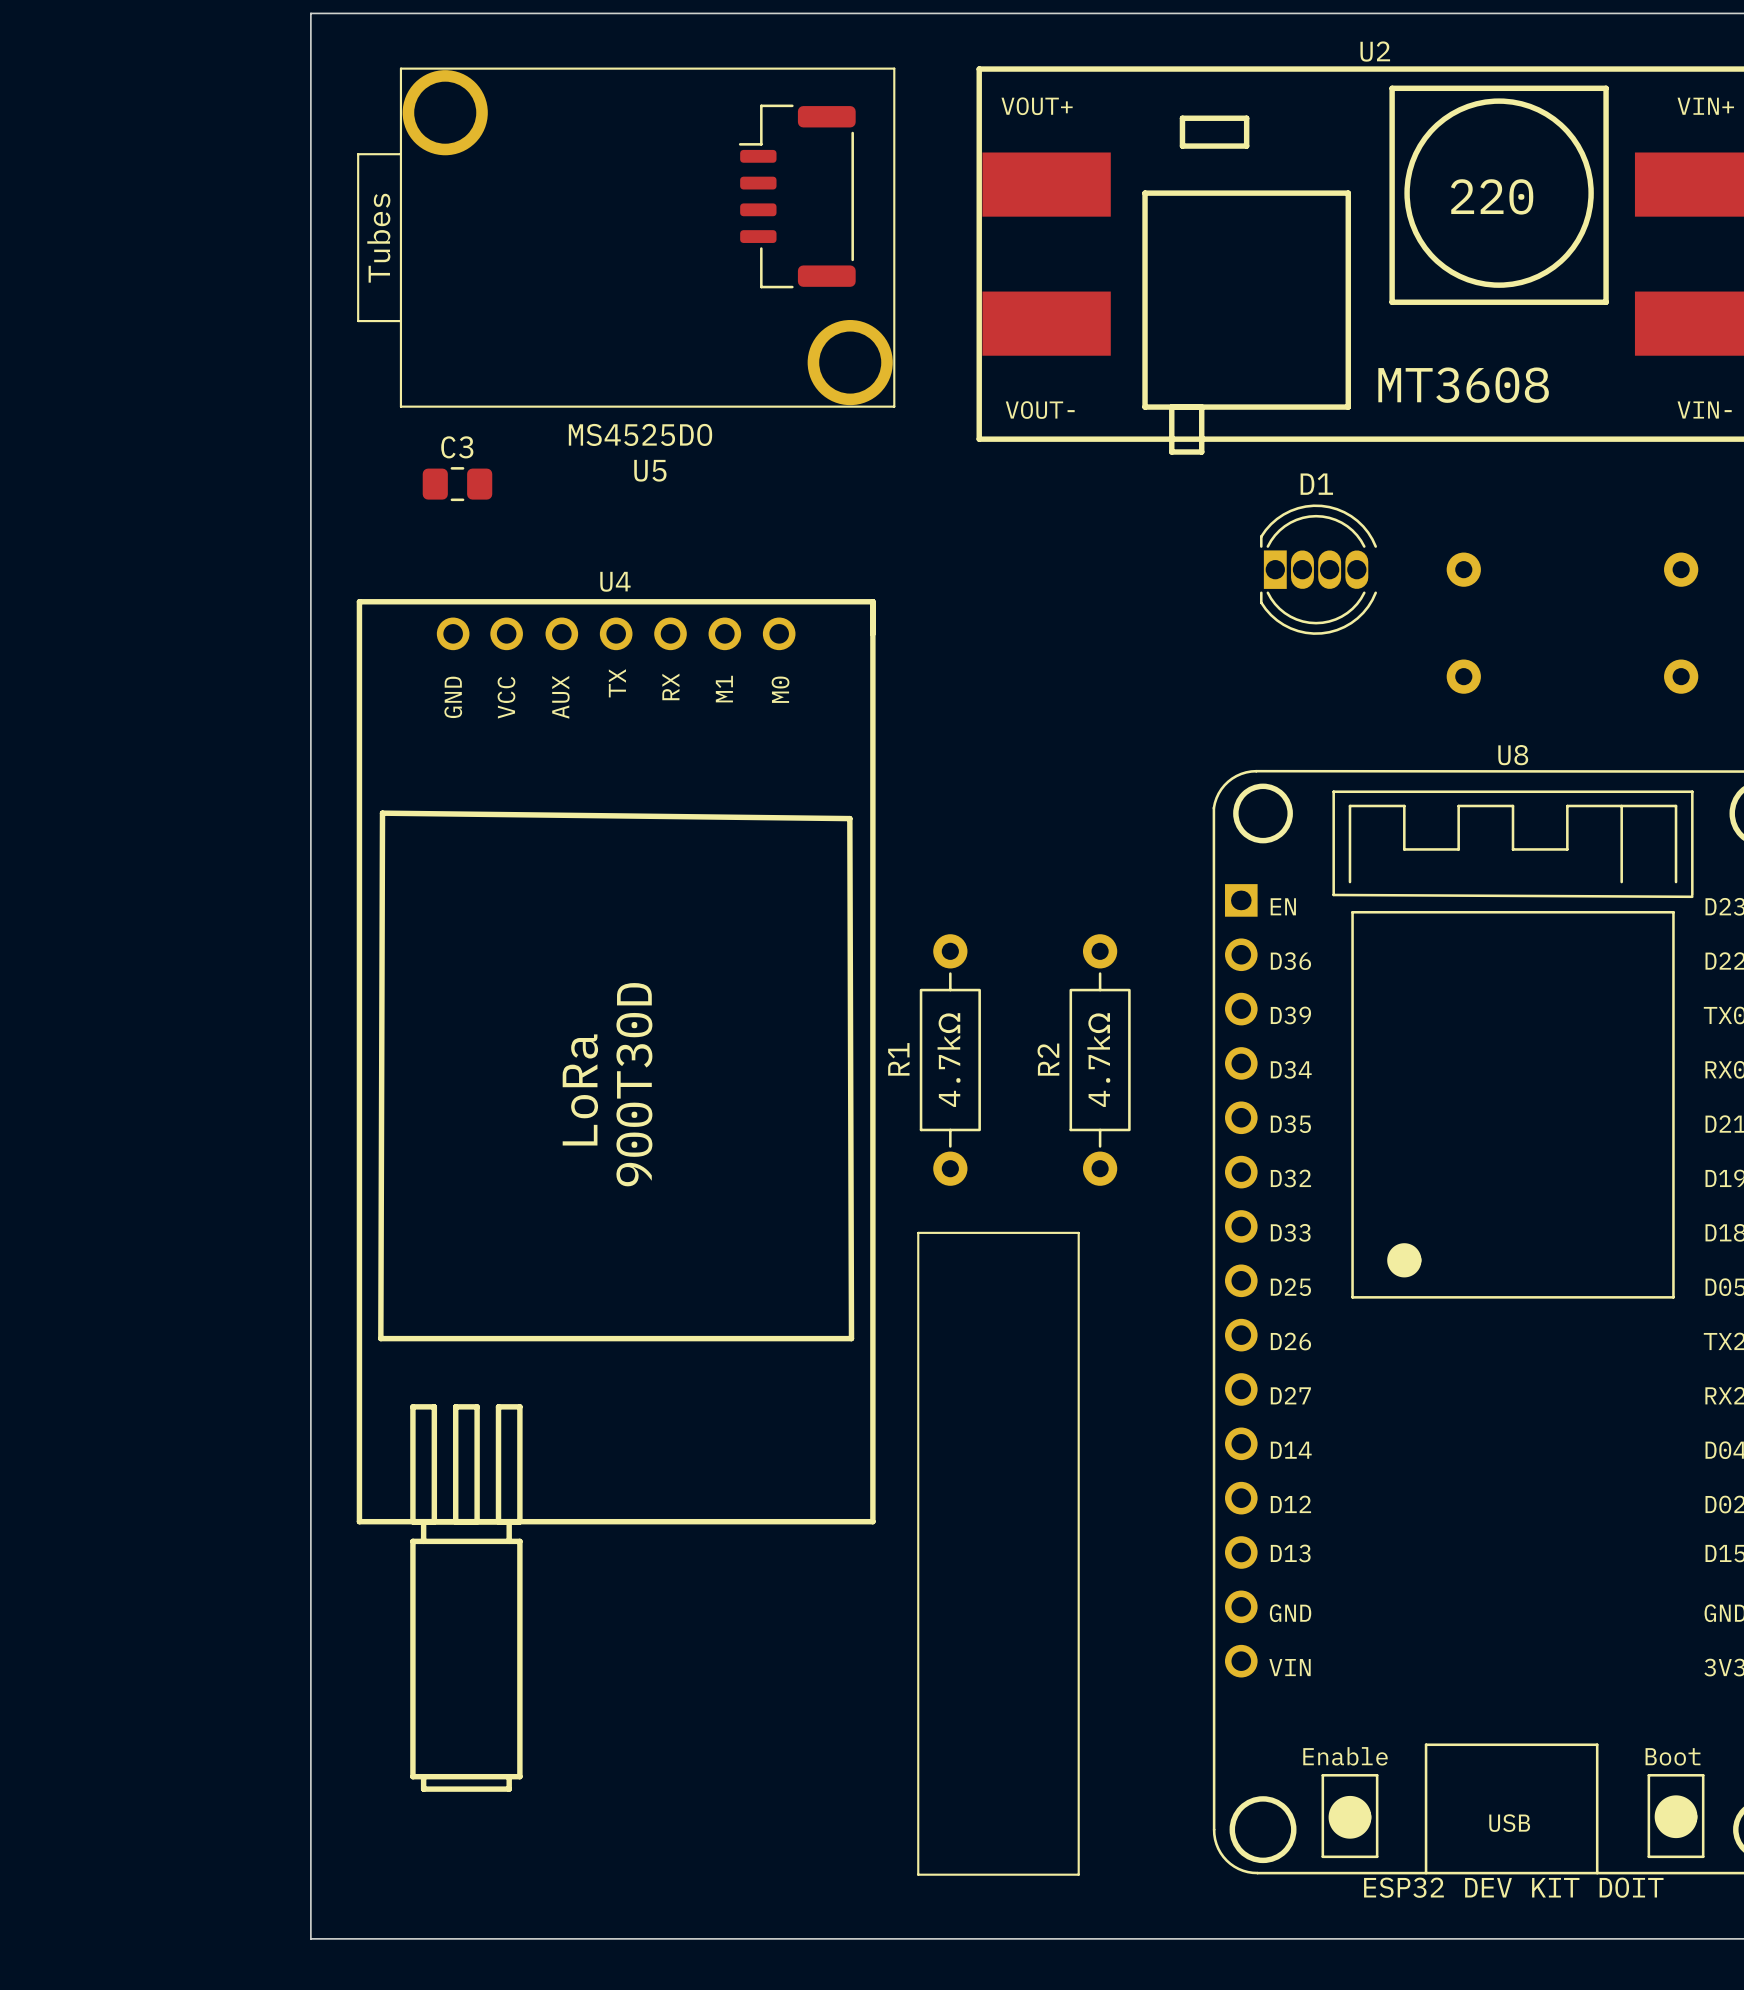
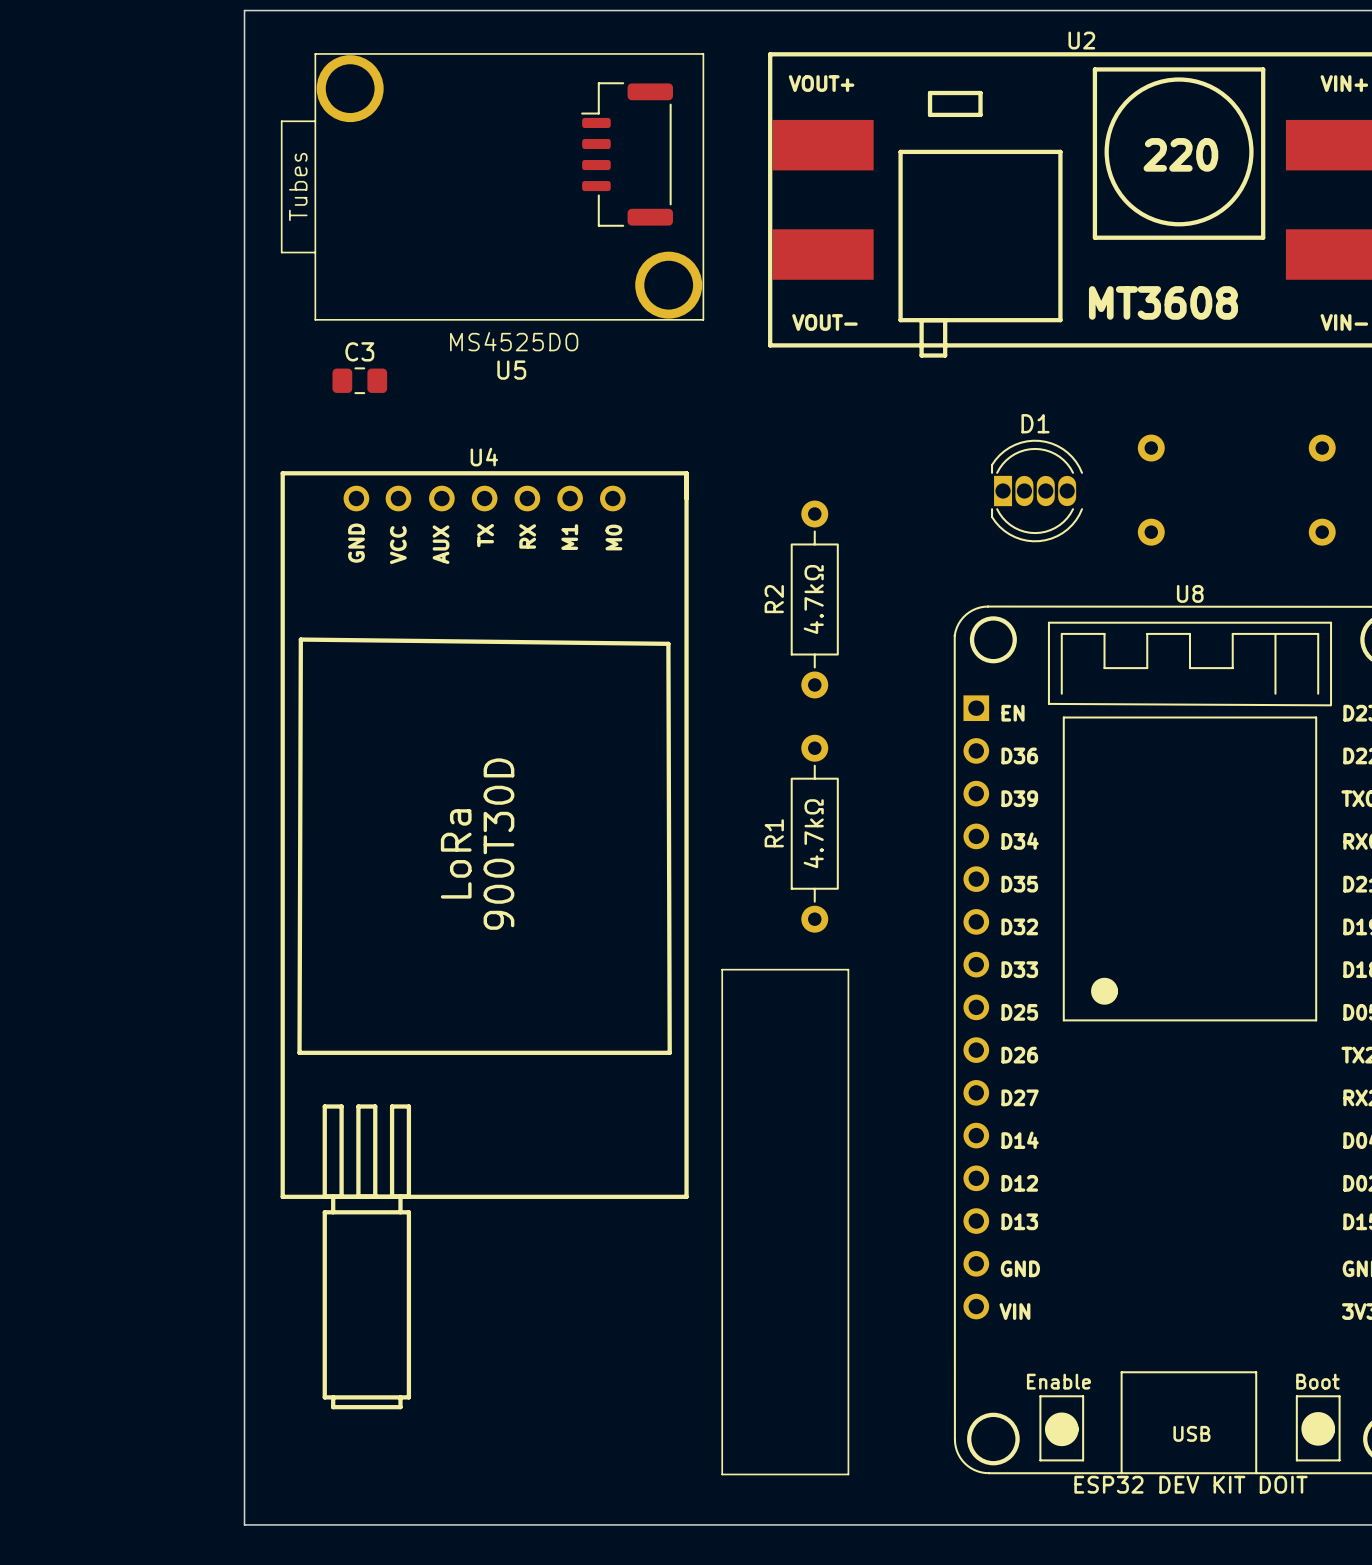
D1 position: (1318, 569) -> (1037, 491)
R1 position: (950, 1060) -> (814, 833)
R2 position: (1100, 1060) -> (814, 599)

